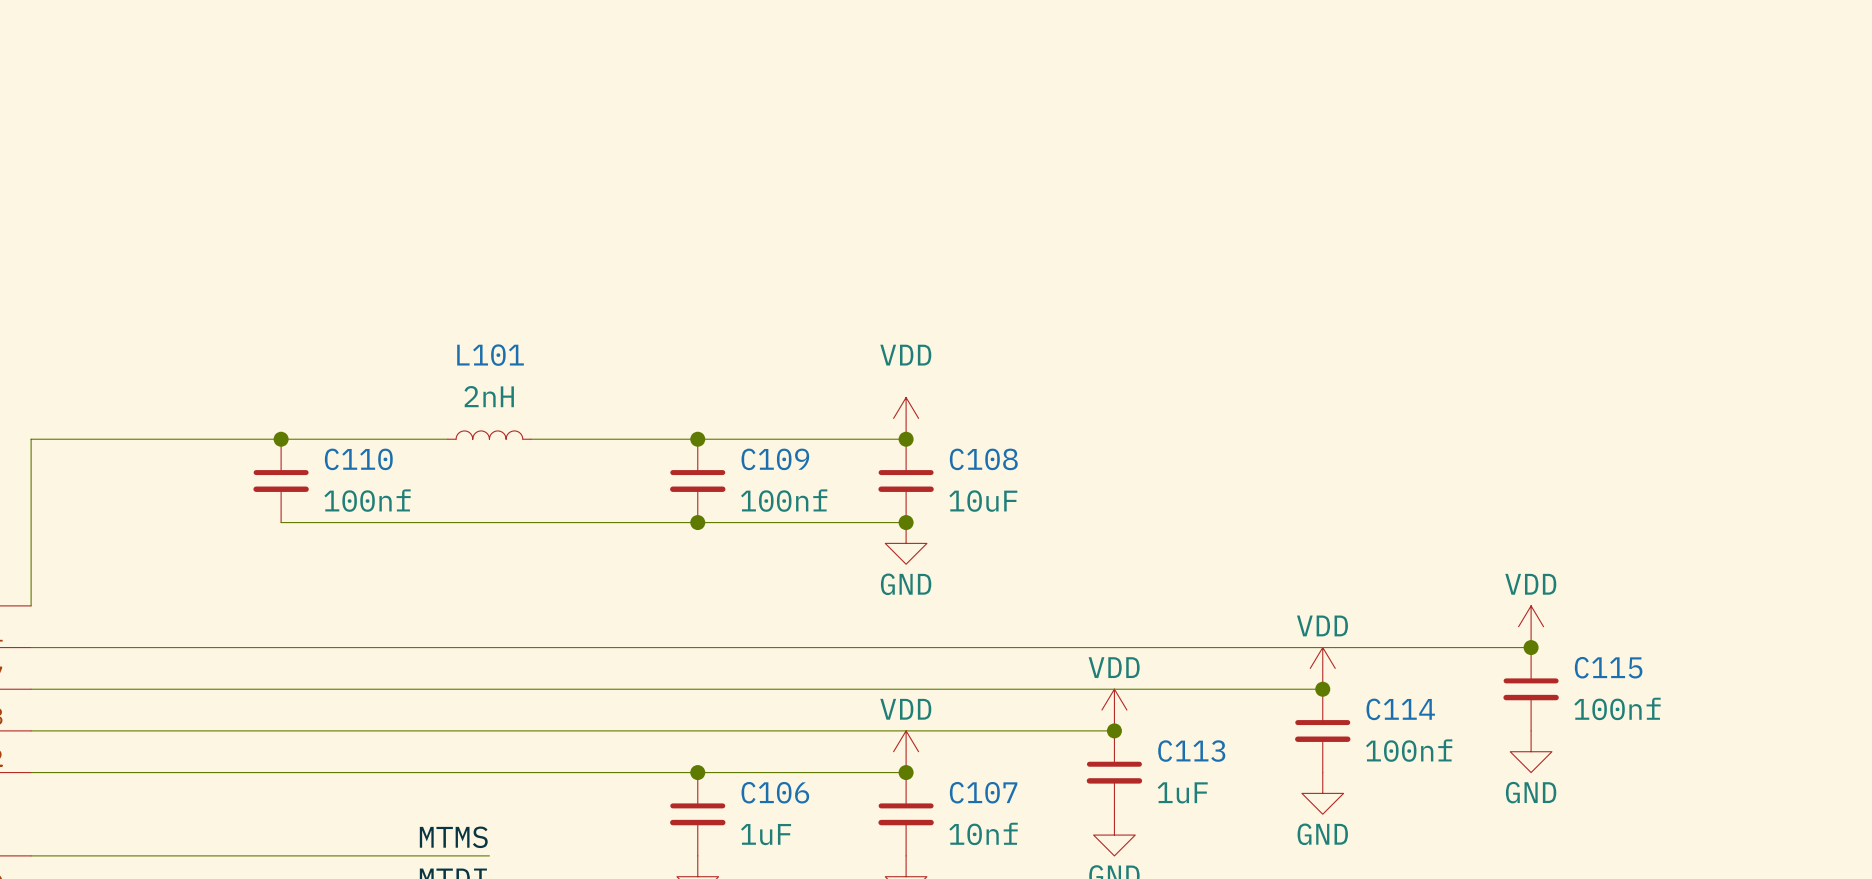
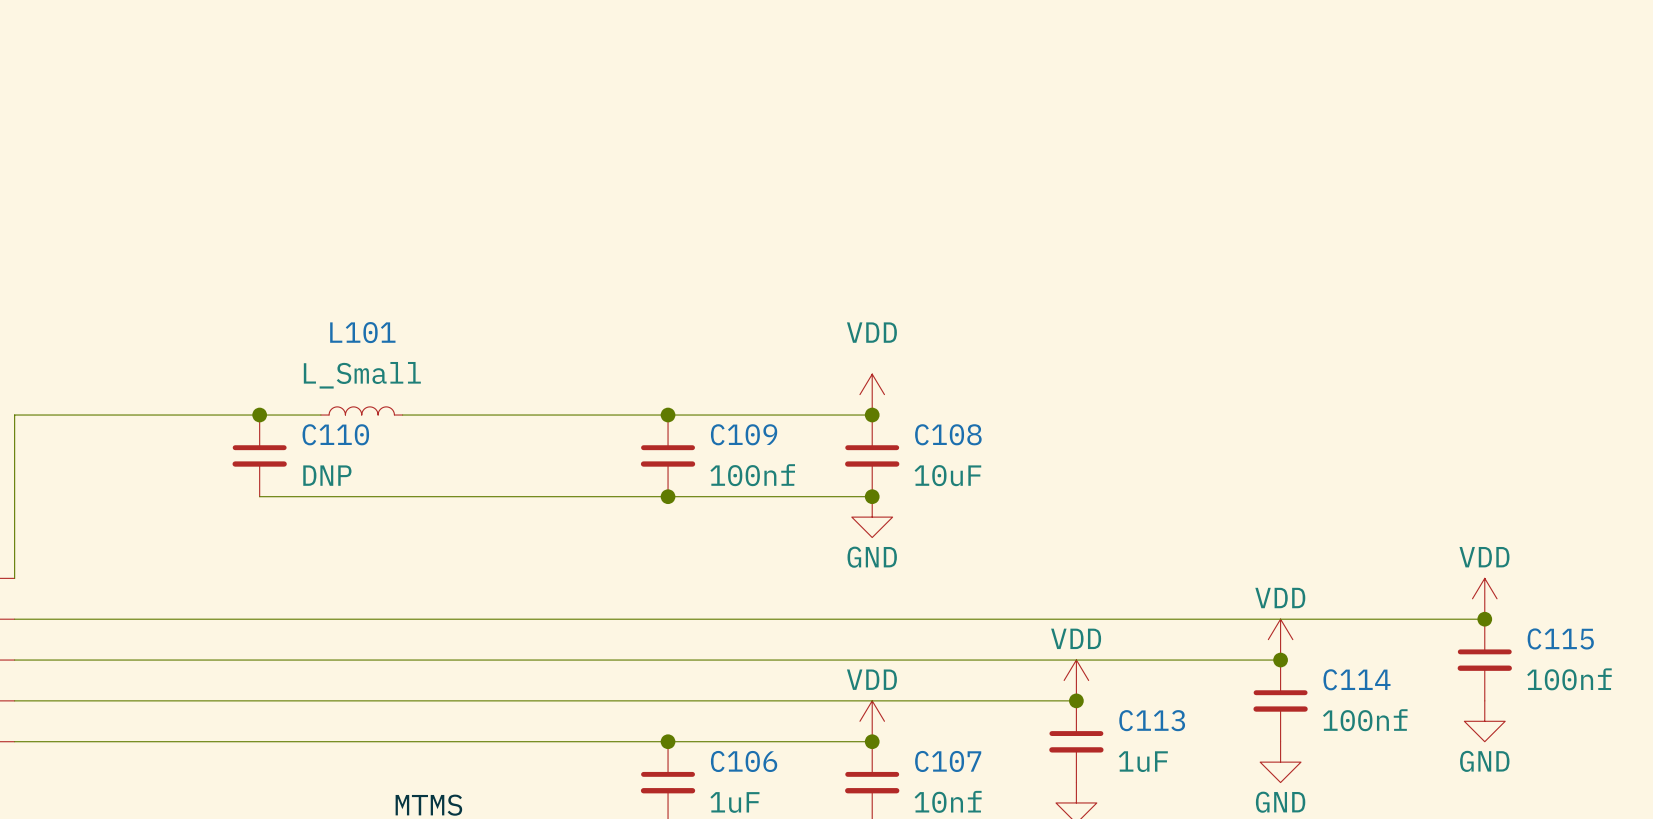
L101 value: 2nH (489, 396) -> L_Small (362, 375)
L101 position: (489, 435) -> (361, 410)
wire: (343, 439) (426, 439) -> (423, 415) (504, 415)
C110 text: 100nf (367, 500) -> DNP (327, 475)

